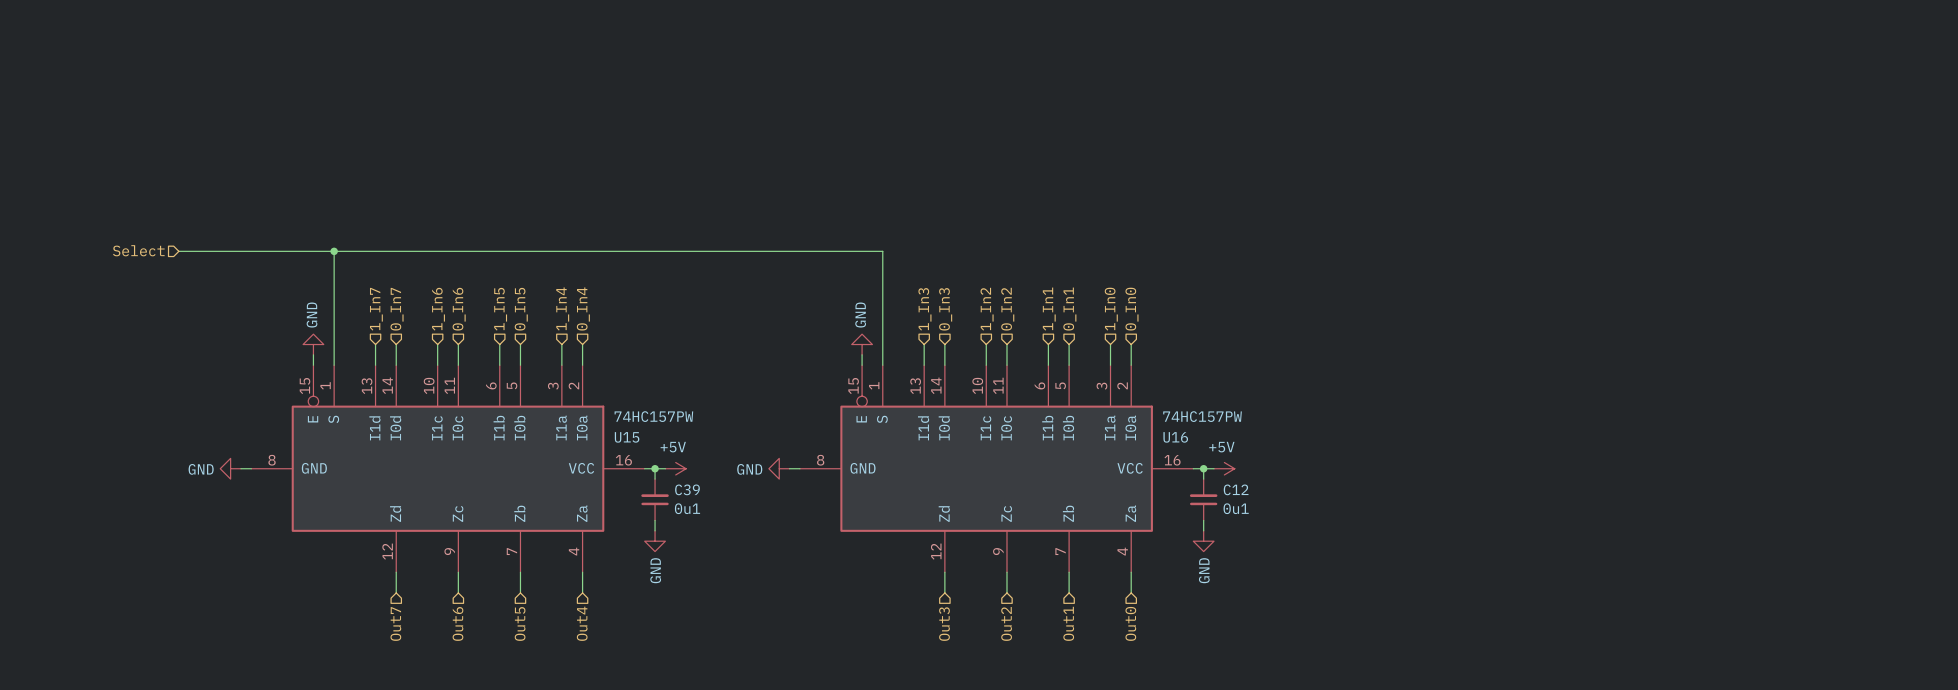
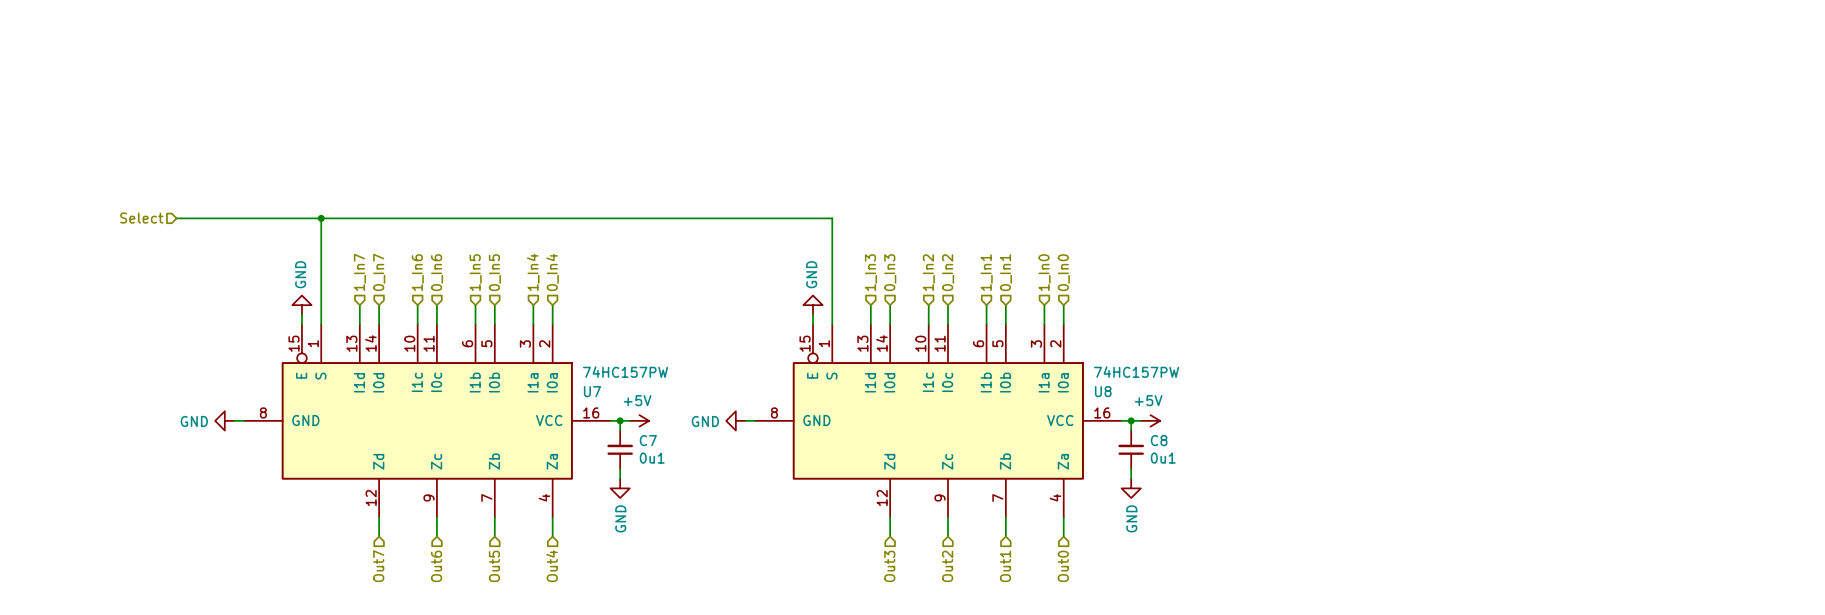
U15 name: U15 (627, 437) -> U7 (592, 391)
U16 name: U16 (1175, 437) -> U8 (1103, 391)
C39 name: C39 (687, 489) -> C7 (648, 440)
C12 name: C12 (1236, 489) -> C8 (1159, 440)

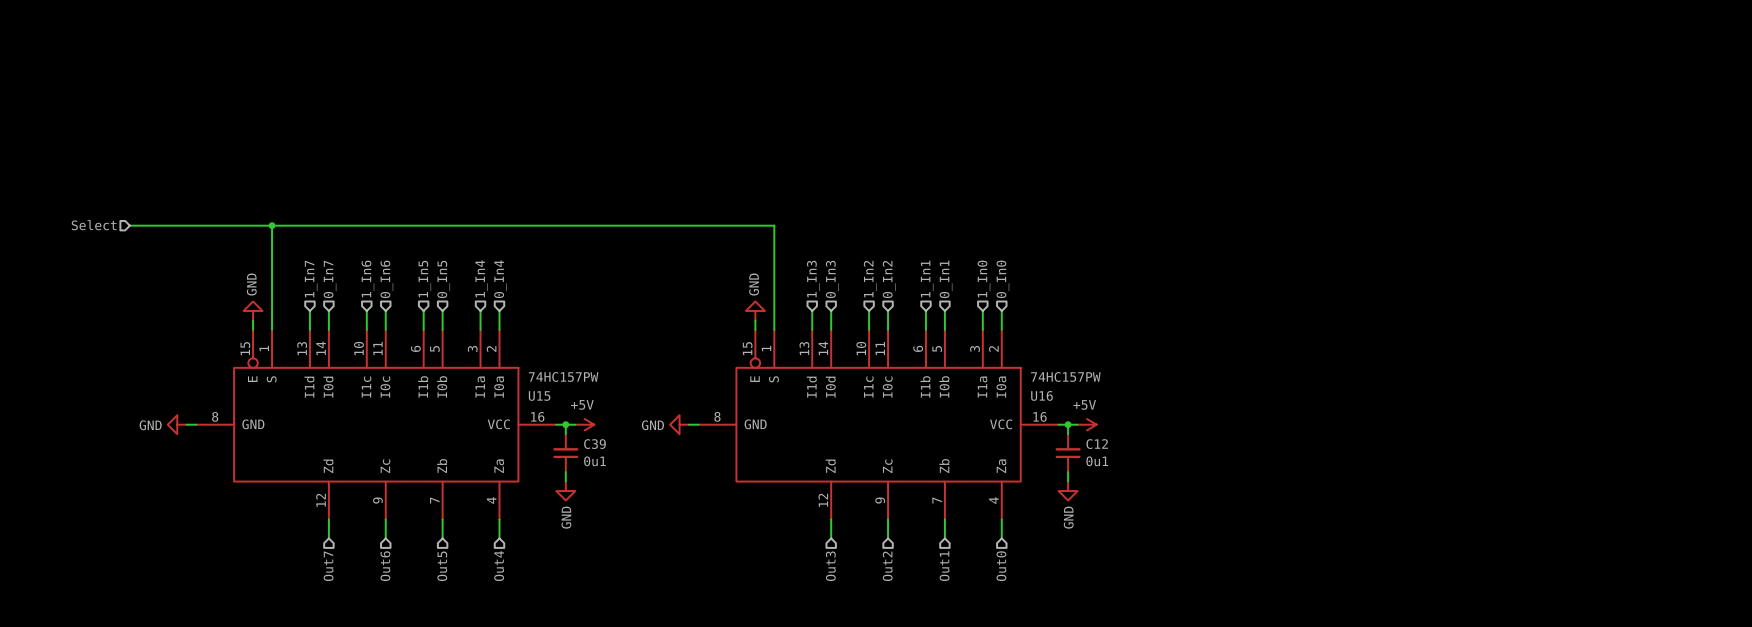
U7 name: U7 (592, 391) -> U15 (539, 396)
U8 name: U8 (1103, 391) -> U16 (1041, 395)
C7 name: C7 (648, 440) -> C39 (595, 444)
C8 name: C8 (1159, 440) -> C12 (1097, 444)

